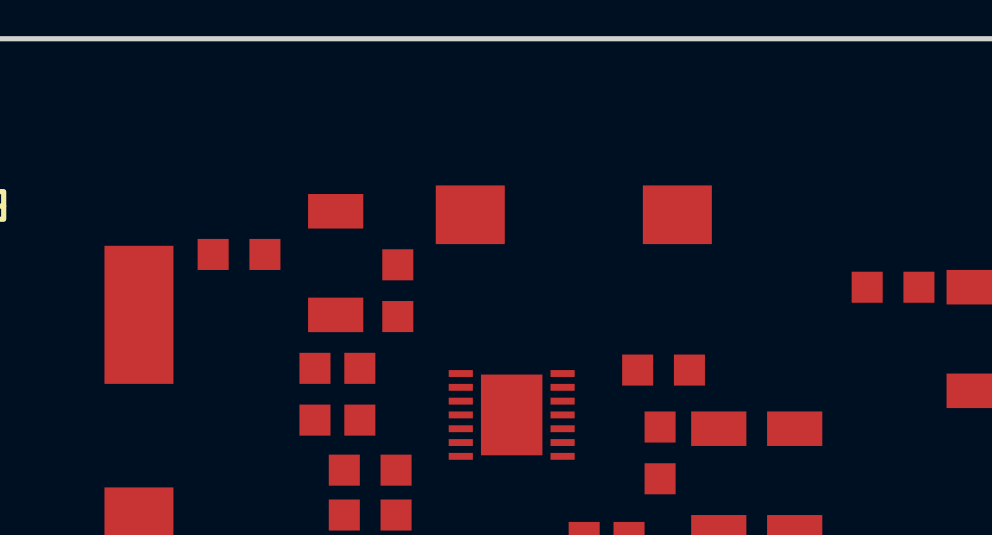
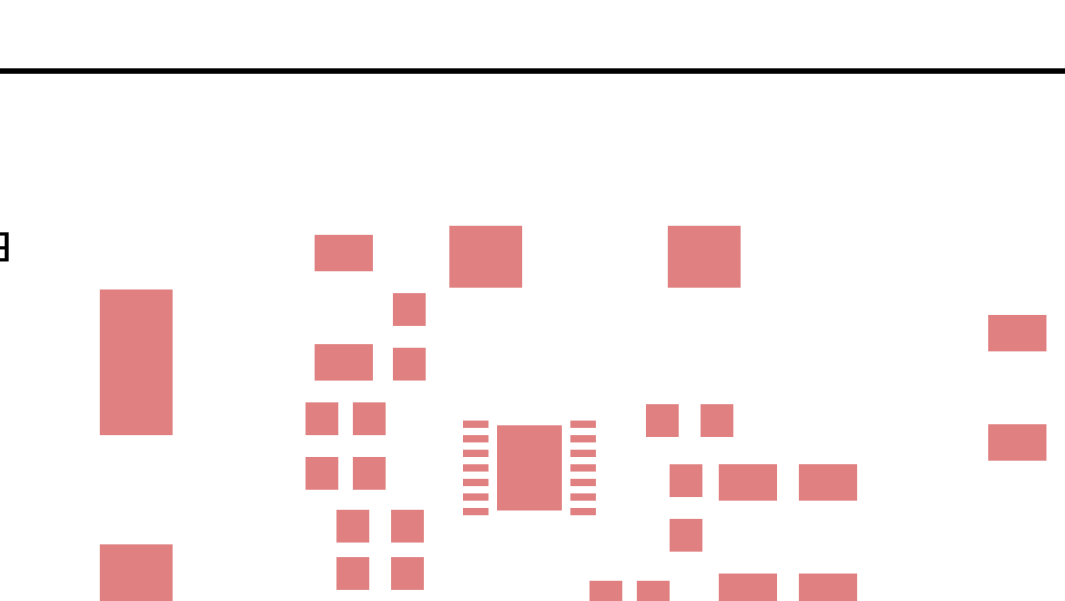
part: (239, 254) -> none
part: (893, 287) -> none

